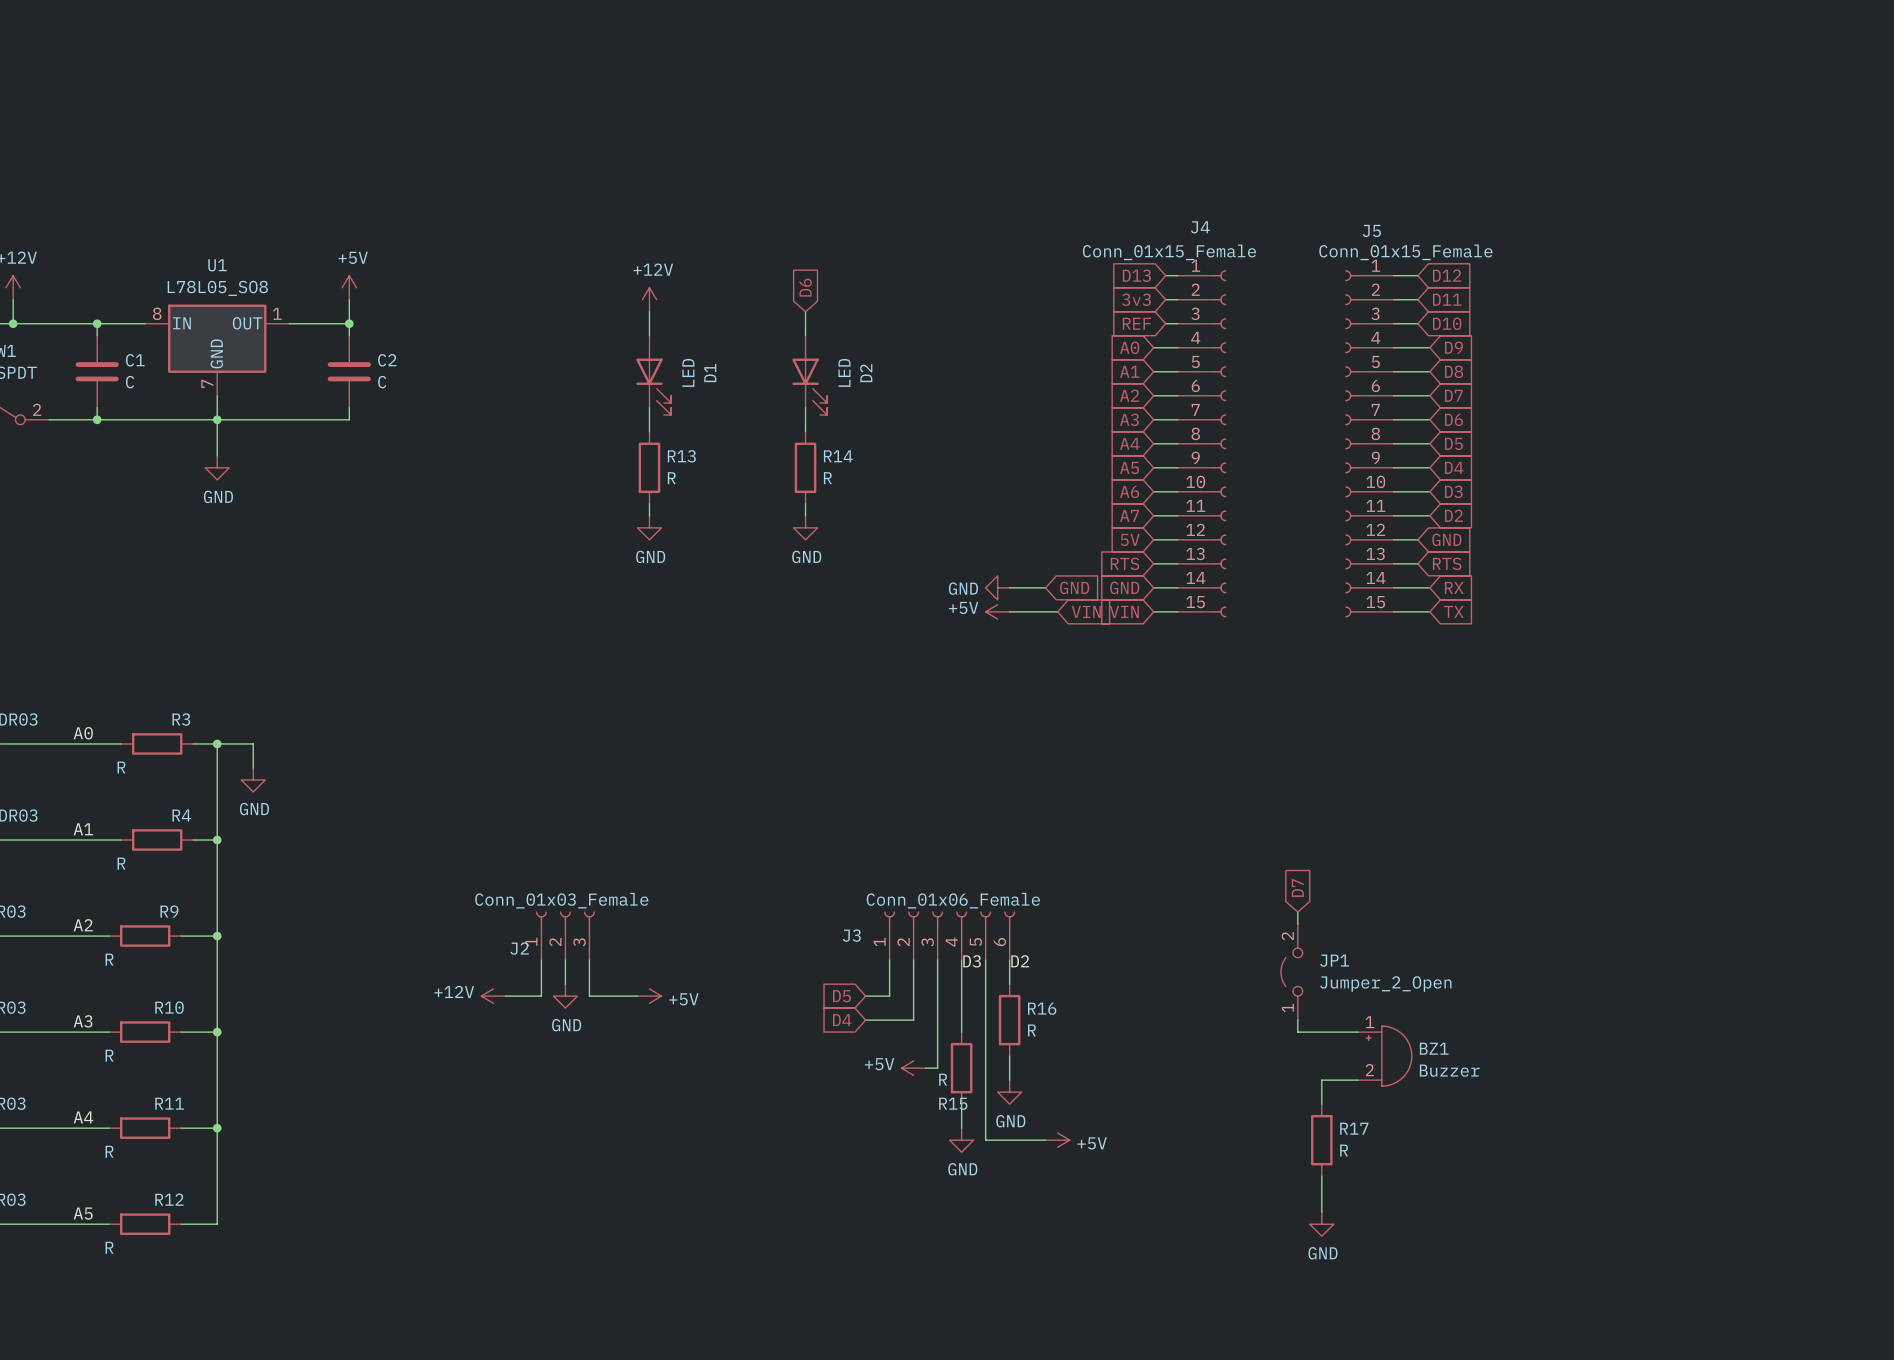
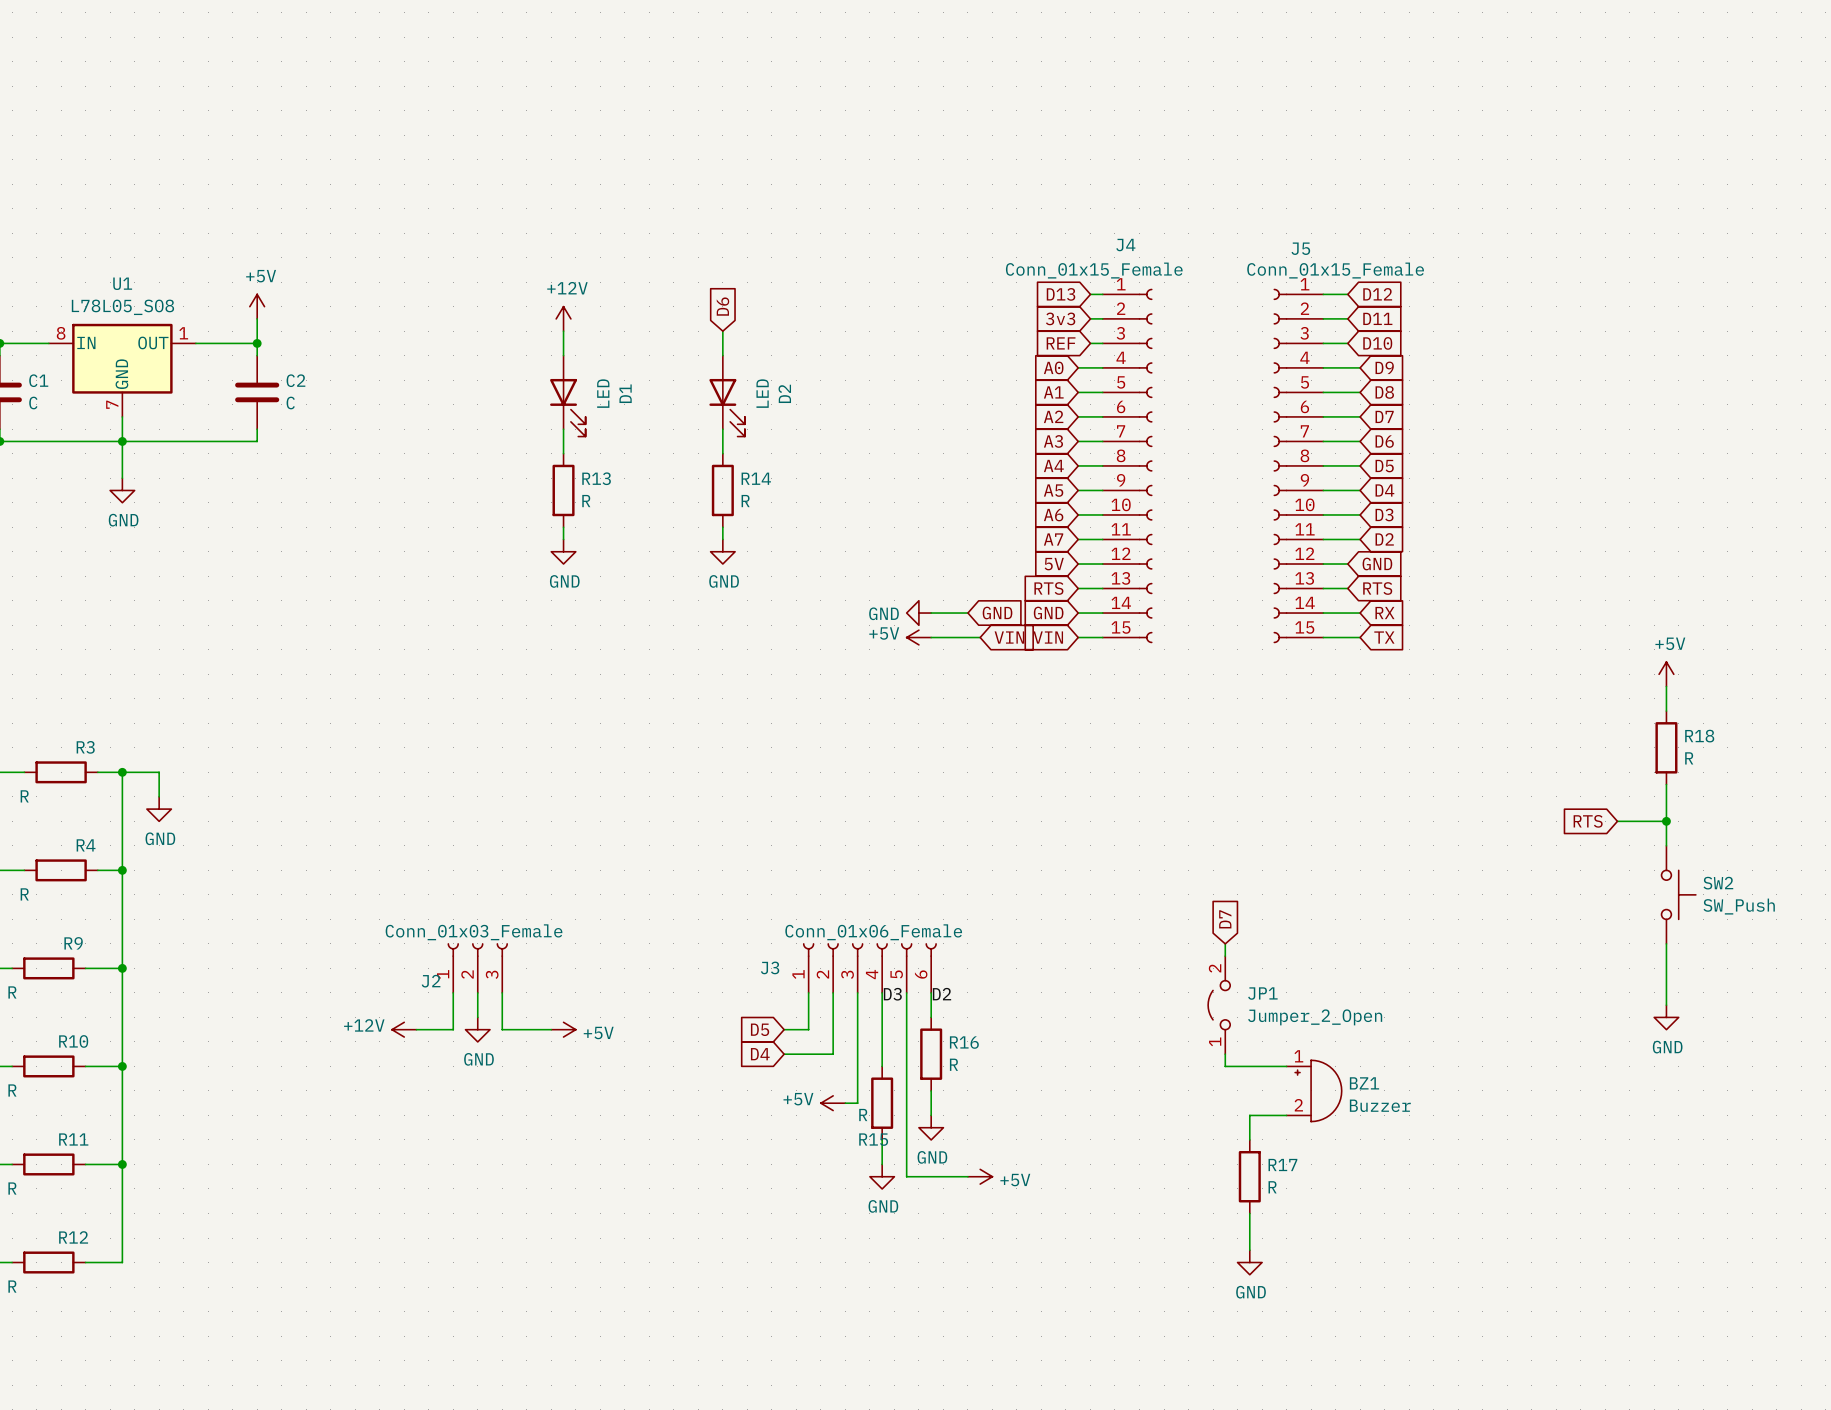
power symbol: none -> +5V (1666, 674)
wire: none -> (1666, 686) (1666, 711)
R18: none -> R (1666, 747)
wire: none -> (1666, 784) (1666, 845)
global label: none -> RTS (1588, 821)
wire: none -> (1617, 821) (1666, 821)
junction: none -> (1666, 821)
SW2: none -> SW_Push (1678, 894)
wire: none -> (1666, 943) (1666, 1005)
power symbol: none -> GND (1666, 1017)

